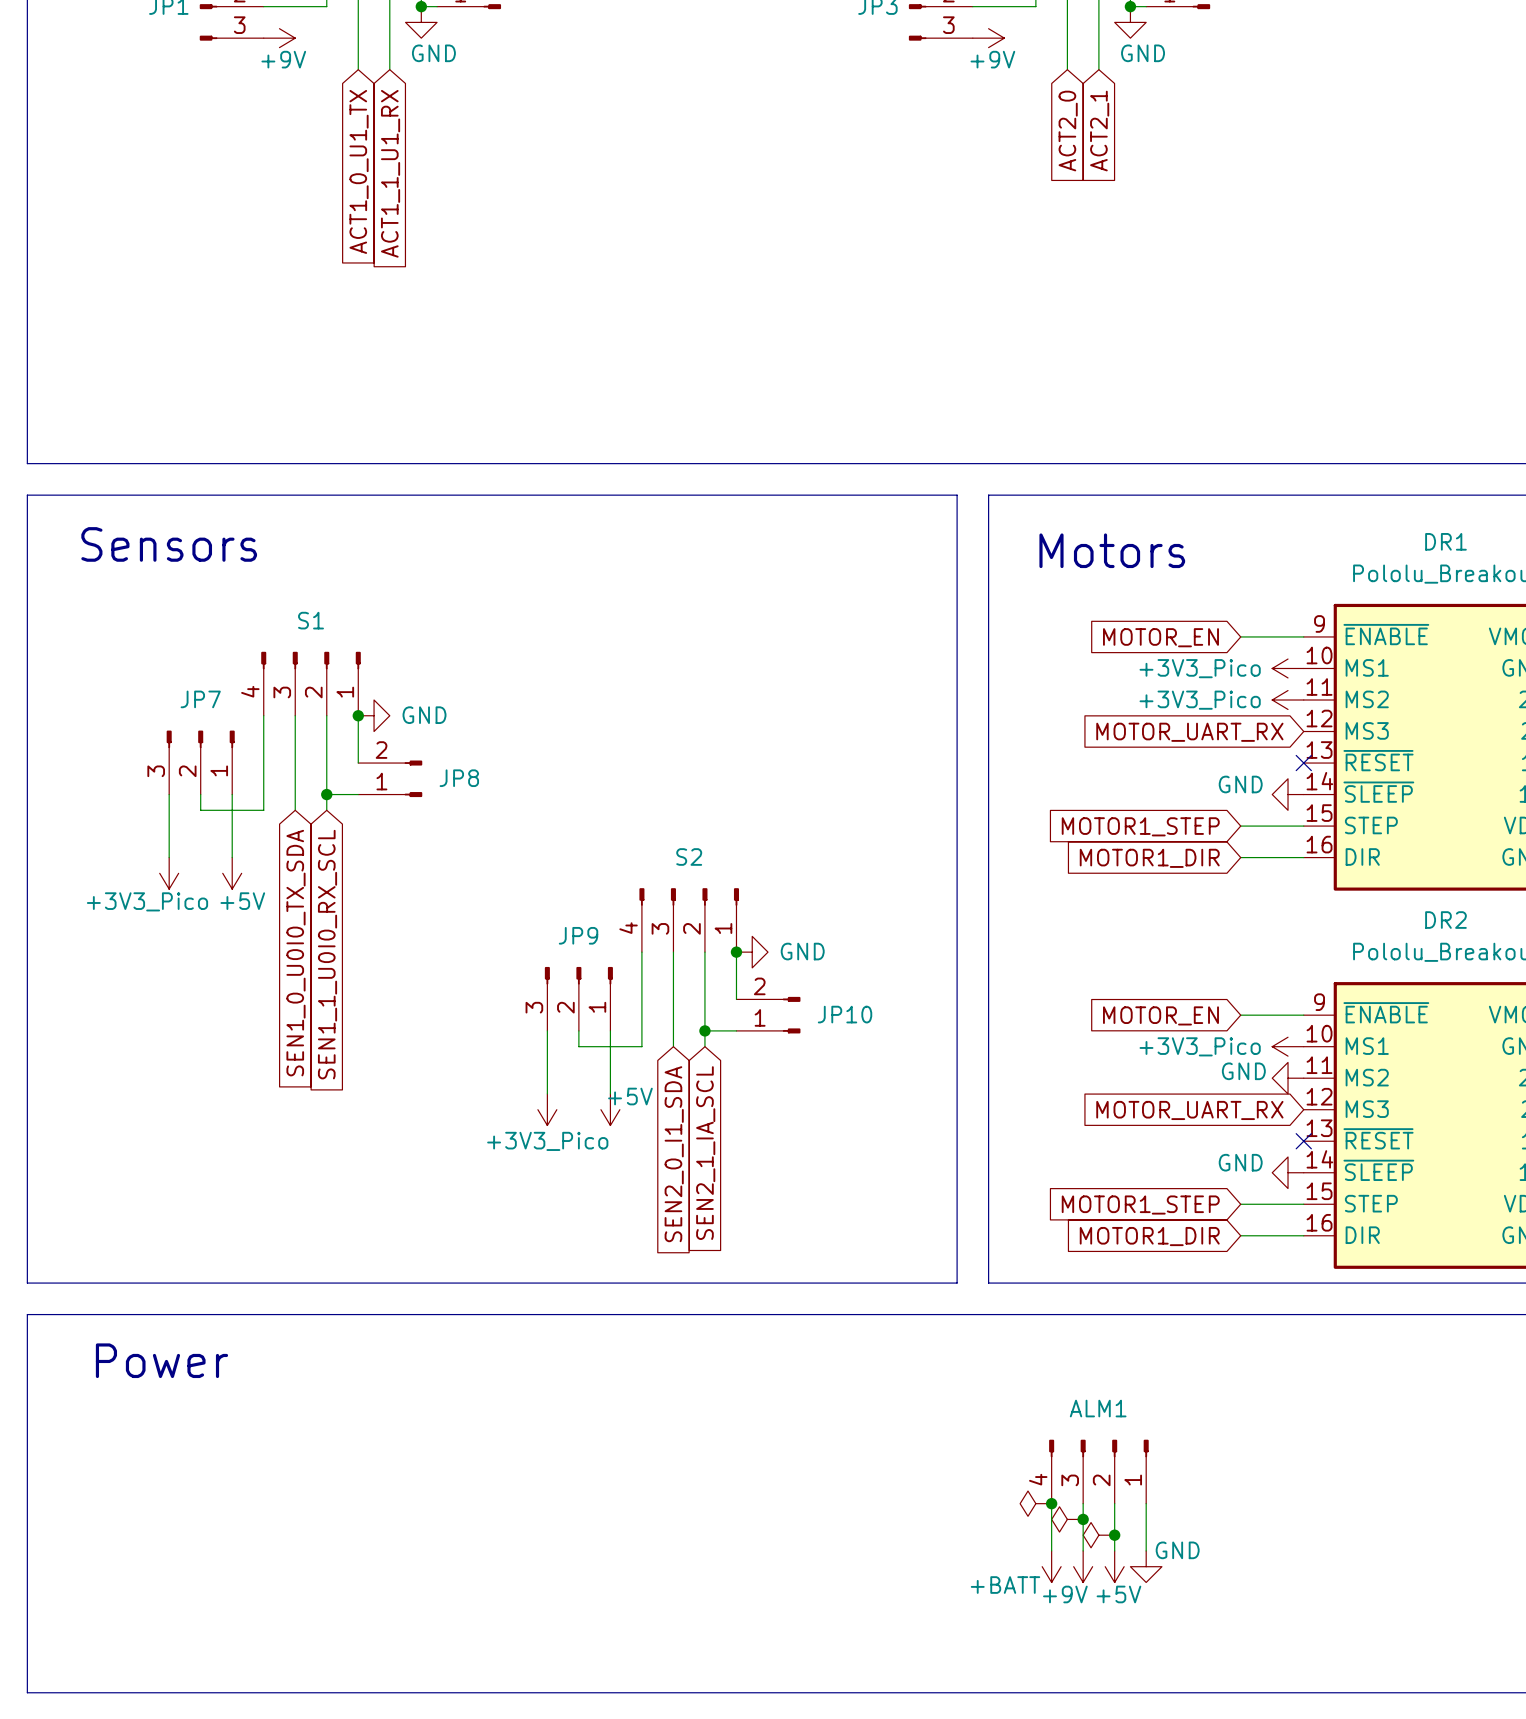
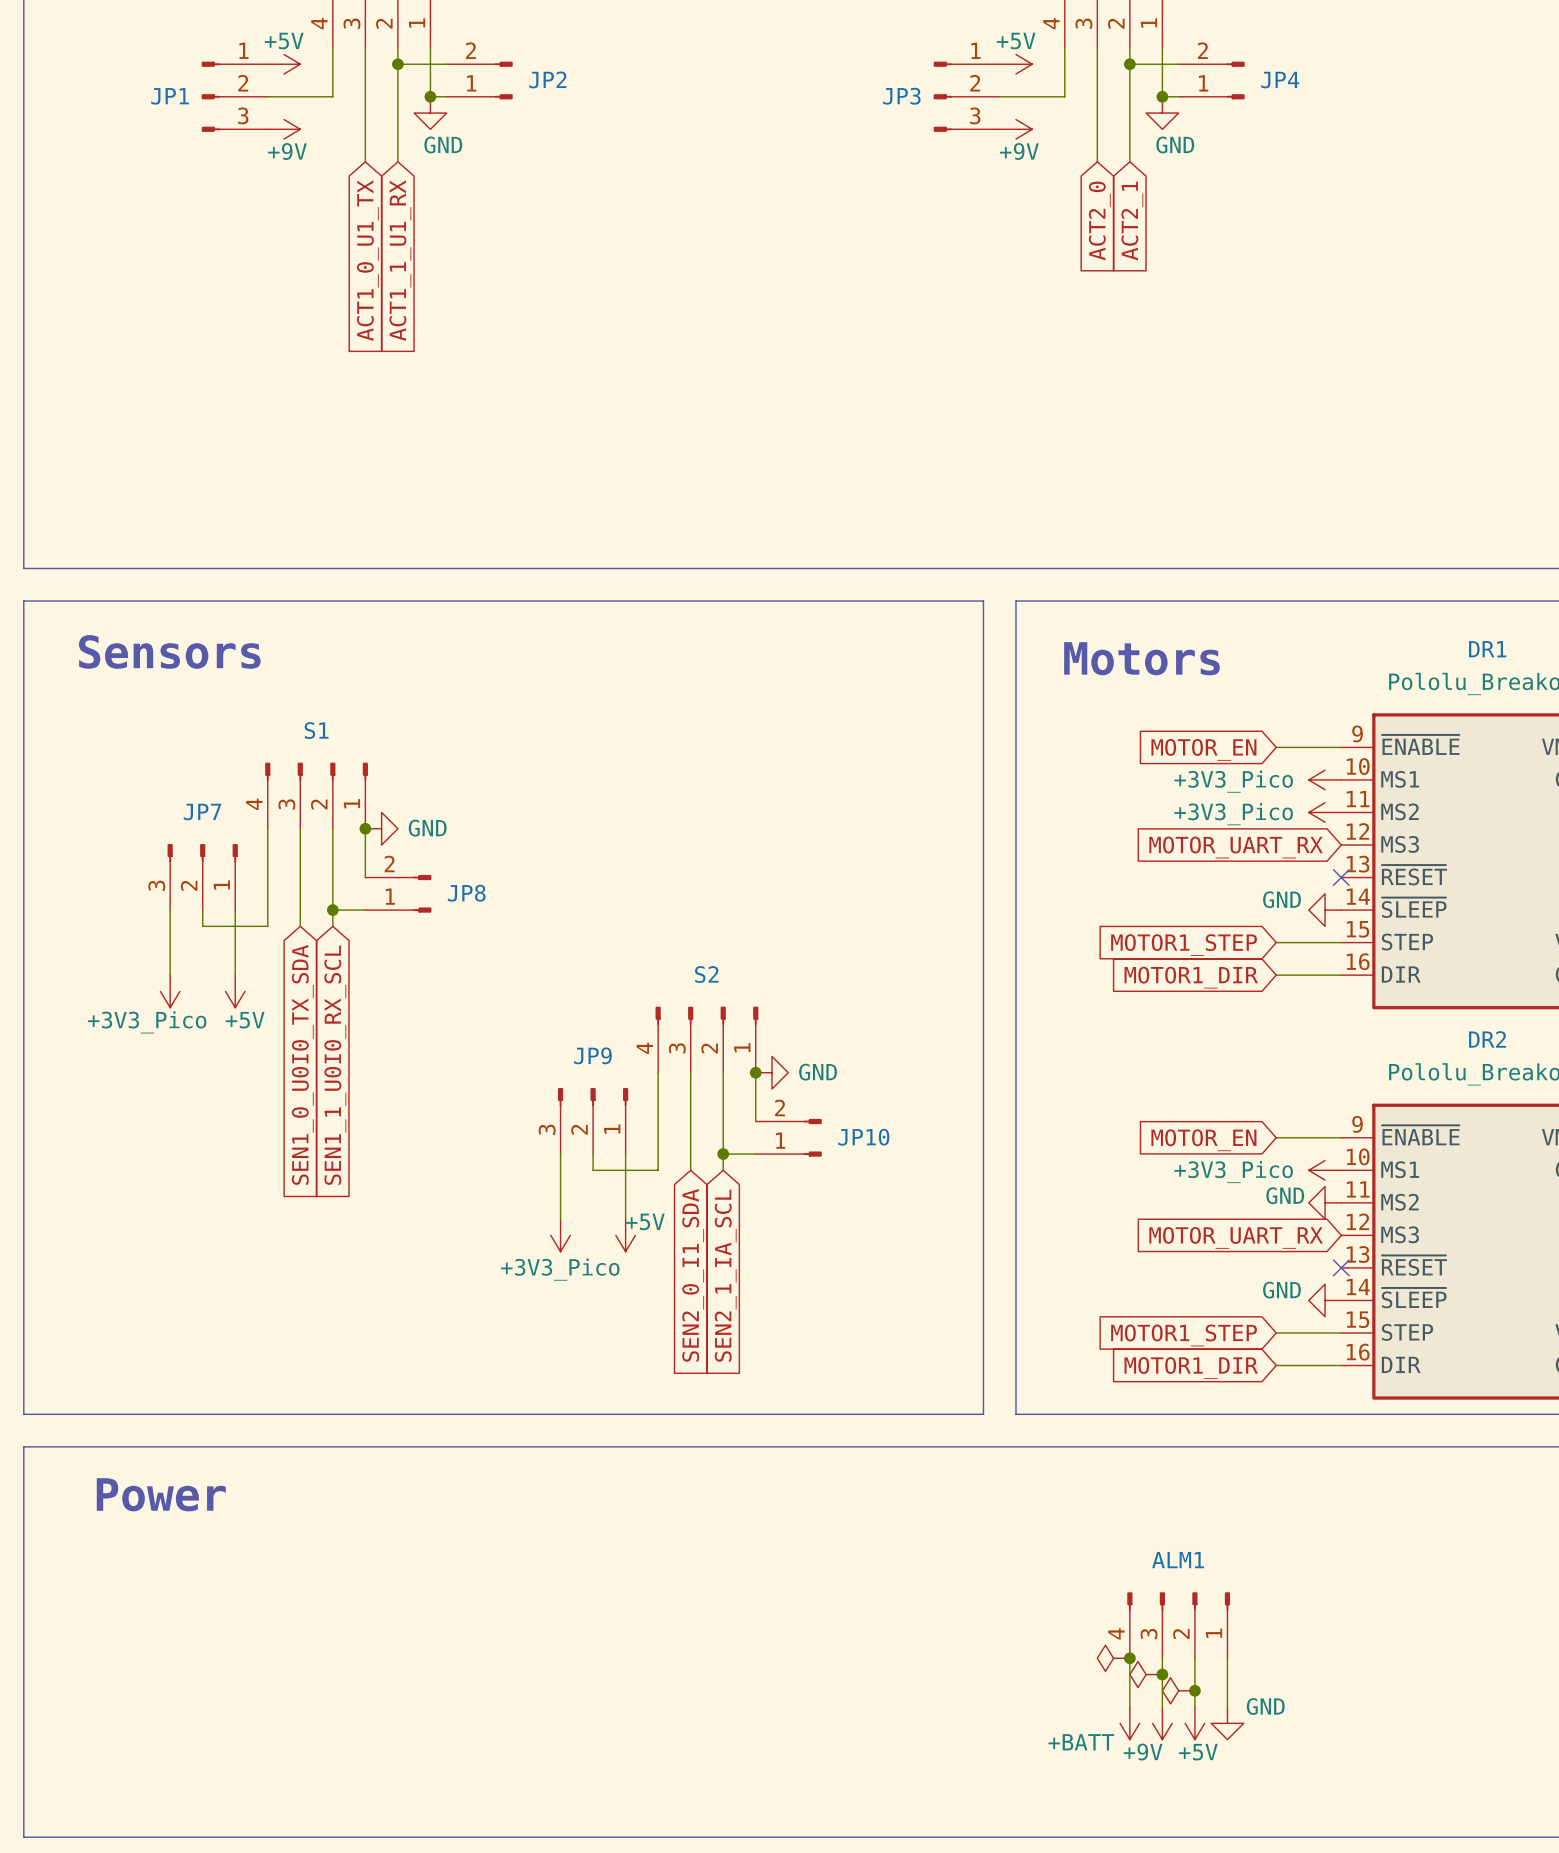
ALM1 position: (1098, 1471) -> (1178, 1625)
power symbol: (1035, 1503) -> none
wire: (1051, 1503) (1051, 1550) -> (1129, 1658) (1129, 1707)
junction: (1051, 1503) -> none
wire: (1083, 1503) (1083, 1550) -> (1162, 1658) (1162, 1707)
wire: (1114, 1503) (1114, 1550) -> (1194, 1658) (1194, 1707)
wire: (1146, 1503) (1146, 1550) -> (1227, 1658) (1227, 1707)
power symbol: (1067, 1519) -> none
junction: (1083, 1519) -> none
power symbol: none -> (1113, 1658)
junction: none -> (1129, 1658)
power symbol: (1098, 1535) -> none
junction: (1114, 1535) -> none
power symbol: none -> (1146, 1674)
junction: none -> (1162, 1674)
power symbol: none -> (1178, 1690)
junction: none -> (1194, 1690)
power symbol position: +BATT (1051, 1566) -> +BATT (1129, 1723)
power symbol position: +9V (1083, 1566) -> +9V (1162, 1723)
power symbol position: +5V (1114, 1566) -> +5V (1194, 1723)
power symbol position: GND (1146, 1566) -> GND (1227, 1723)

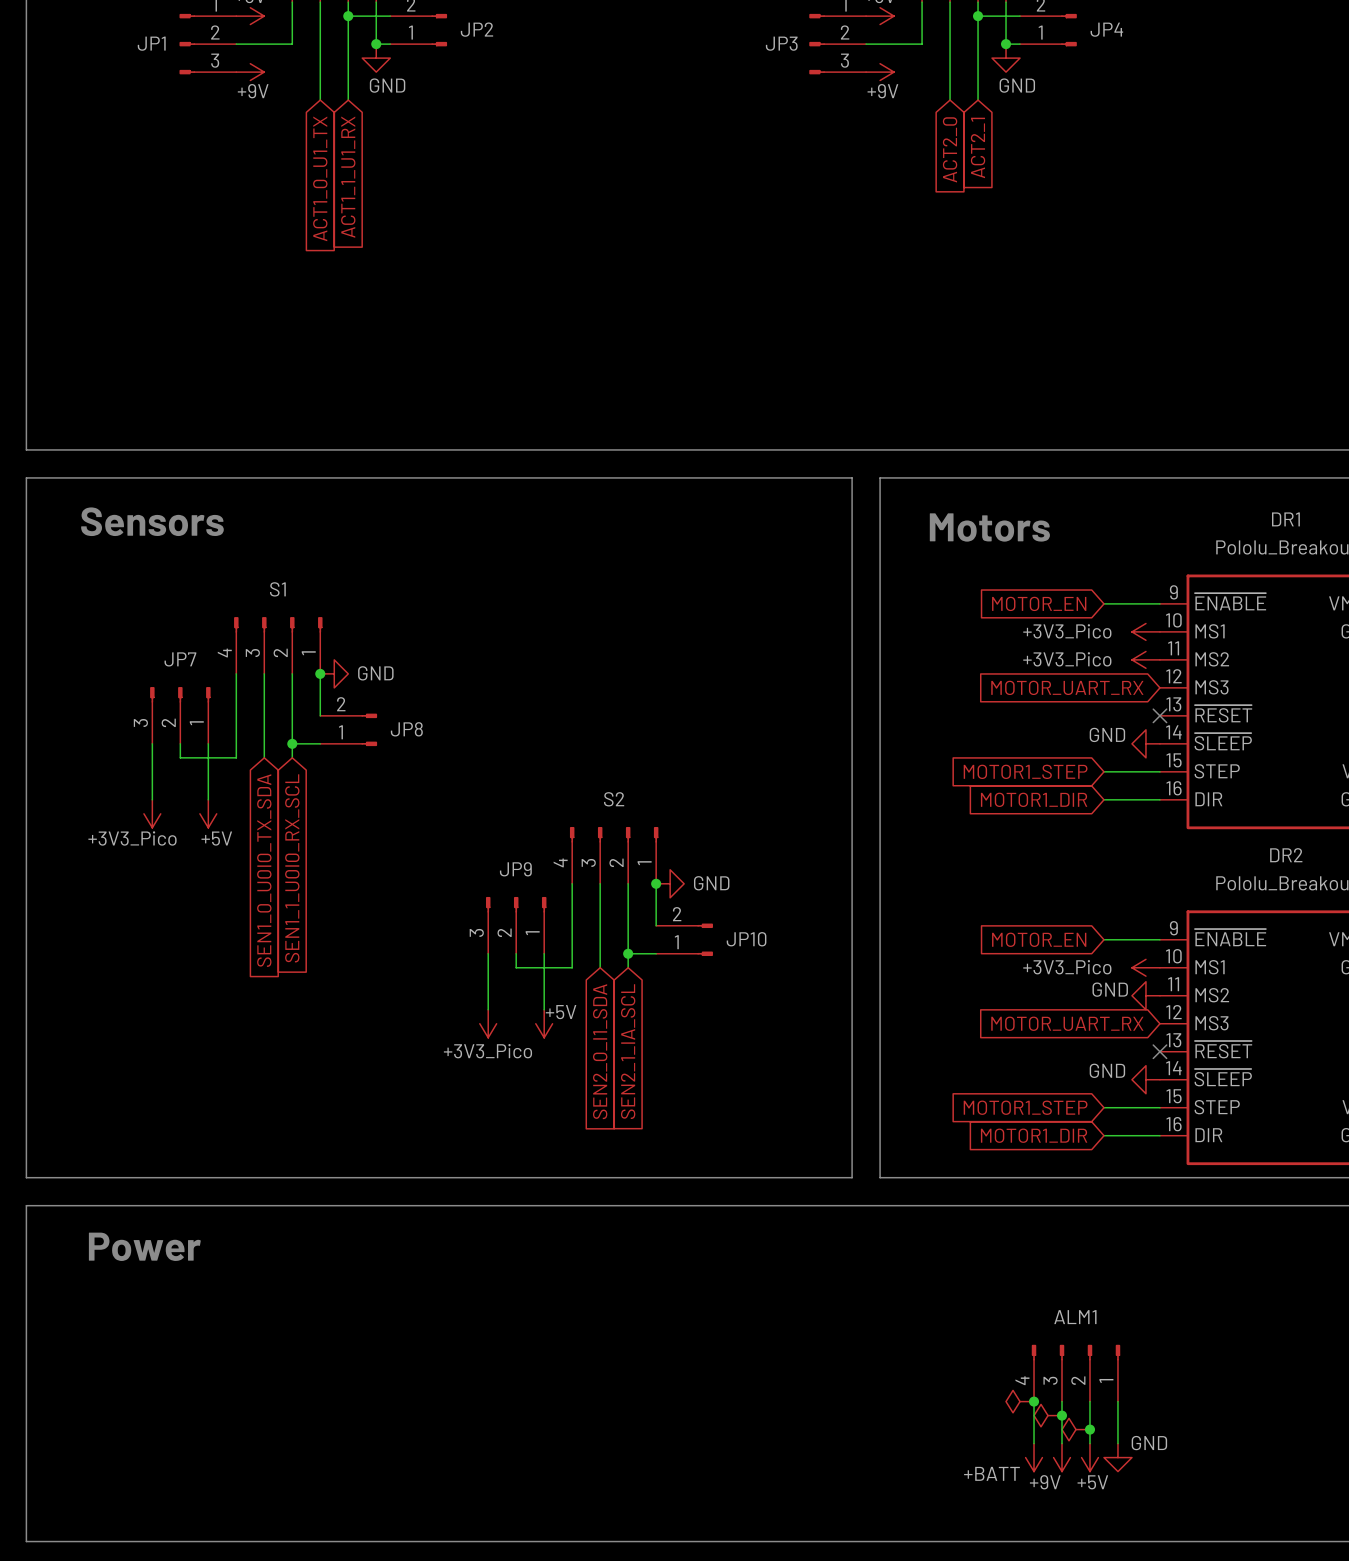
ALM1 position: (1178, 1625) -> (1075, 1373)
power symbol: (1113, 1658) -> none
wire: (1129, 1658) (1129, 1707) -> (1089, 1401) (1089, 1443)
junction: (1129, 1658) -> none
wire: (1162, 1658) (1162, 1707) -> (1117, 1401) (1117, 1443)
power symbol: (1146, 1674) -> none
junction: (1162, 1674) -> none
power symbol: none -> (1020, 1401)
junction: none -> (1034, 1401)
power symbol: (1178, 1690) -> none
junction: (1194, 1690) -> none
power symbol: none -> (1048, 1415)
junction: none -> (1062, 1415)
power symbol: none -> (1075, 1429)
junction: none -> (1089, 1429)
power symbol position: +BATT (1129, 1723) -> +BATT (1034, 1457)
power symbol position: +9V (1162, 1723) -> +9V (1062, 1457)
power symbol position: +5V (1194, 1723) -> +5V (1089, 1457)
power symbol position: GND (1227, 1723) -> GND (1117, 1457)

